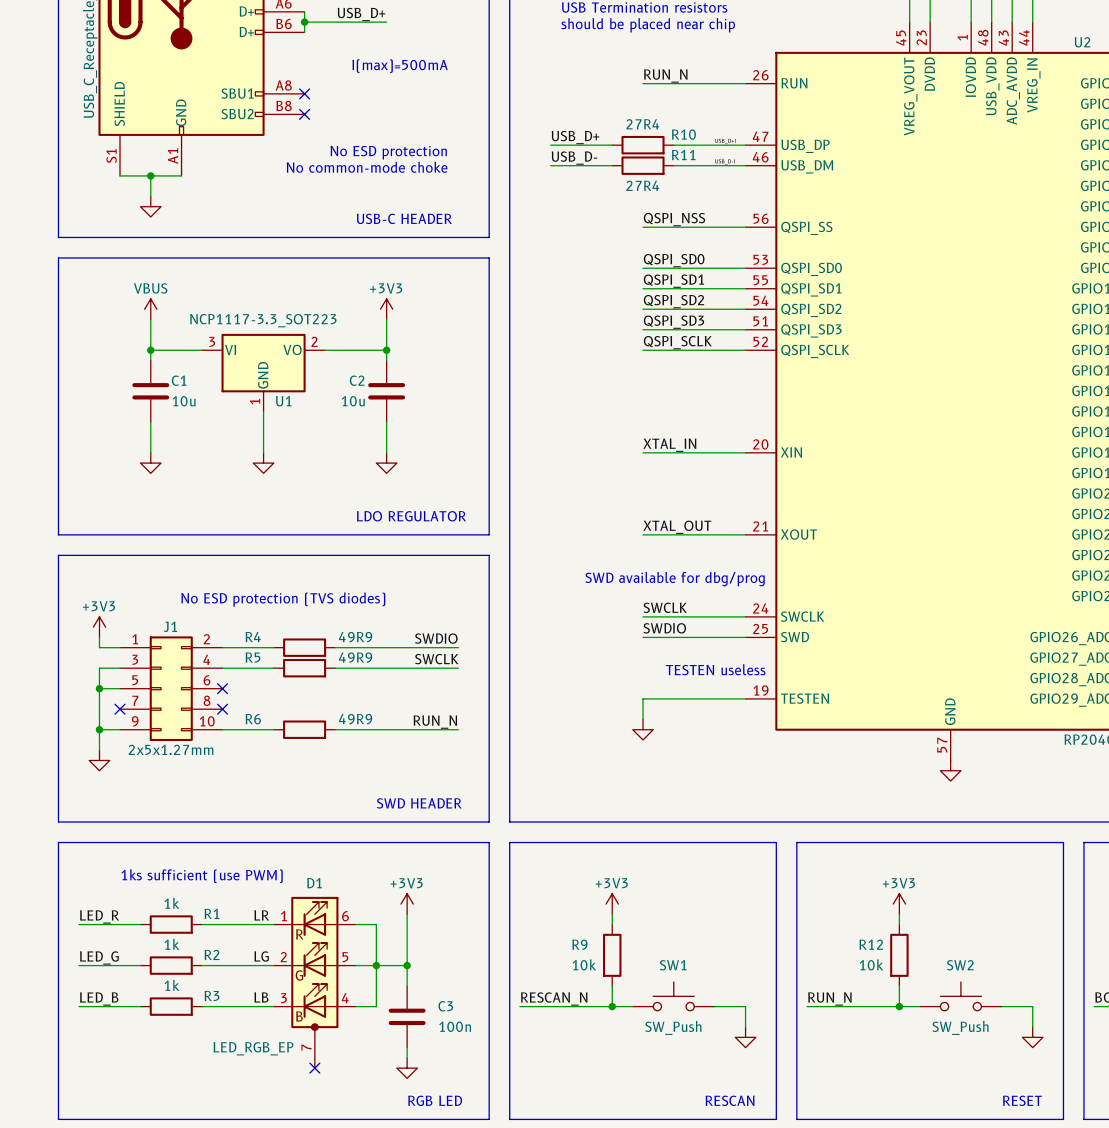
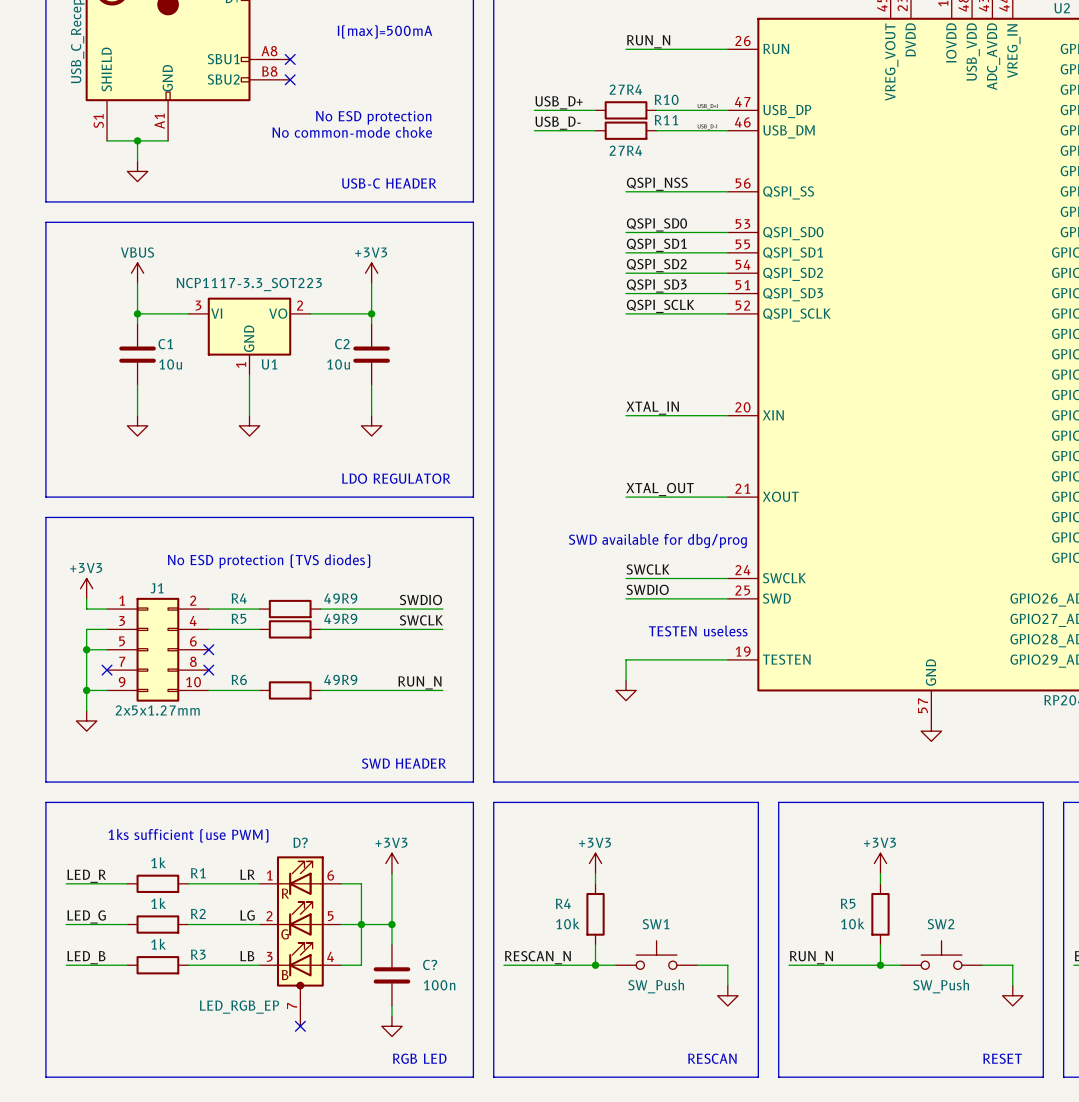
D1 name: D1 (314, 883) -> D? (300, 842)
R9 name: R9 (579, 944) -> R4 (563, 903)
R12 name: R12 (871, 944) -> R5 (848, 903)
C3 name: C3 (445, 1006) -> C? (430, 964)

